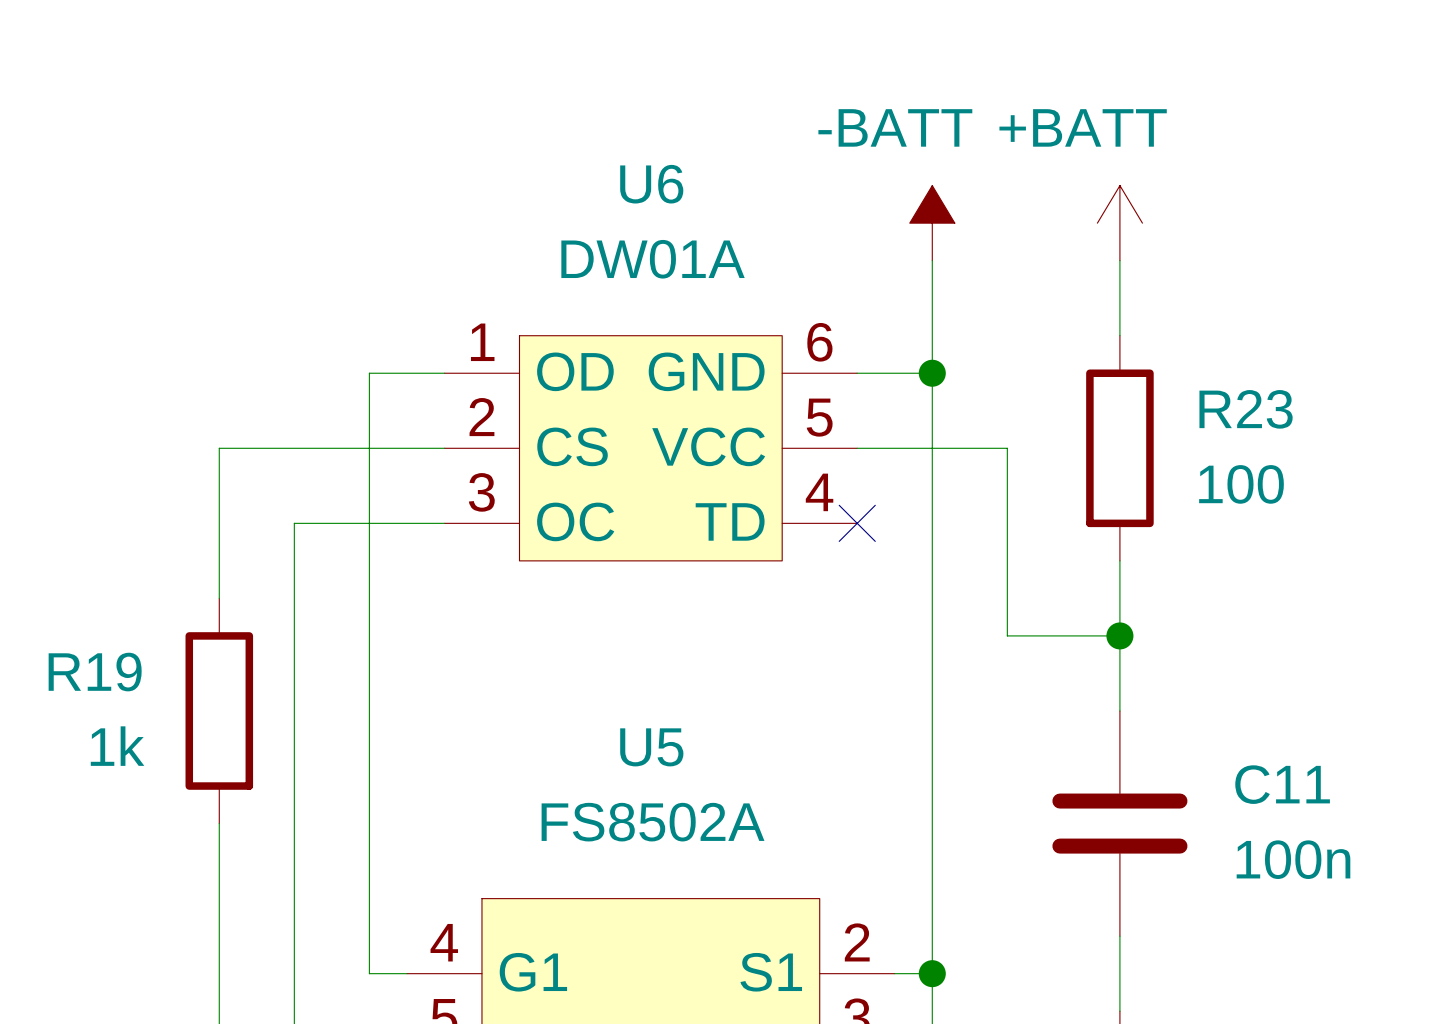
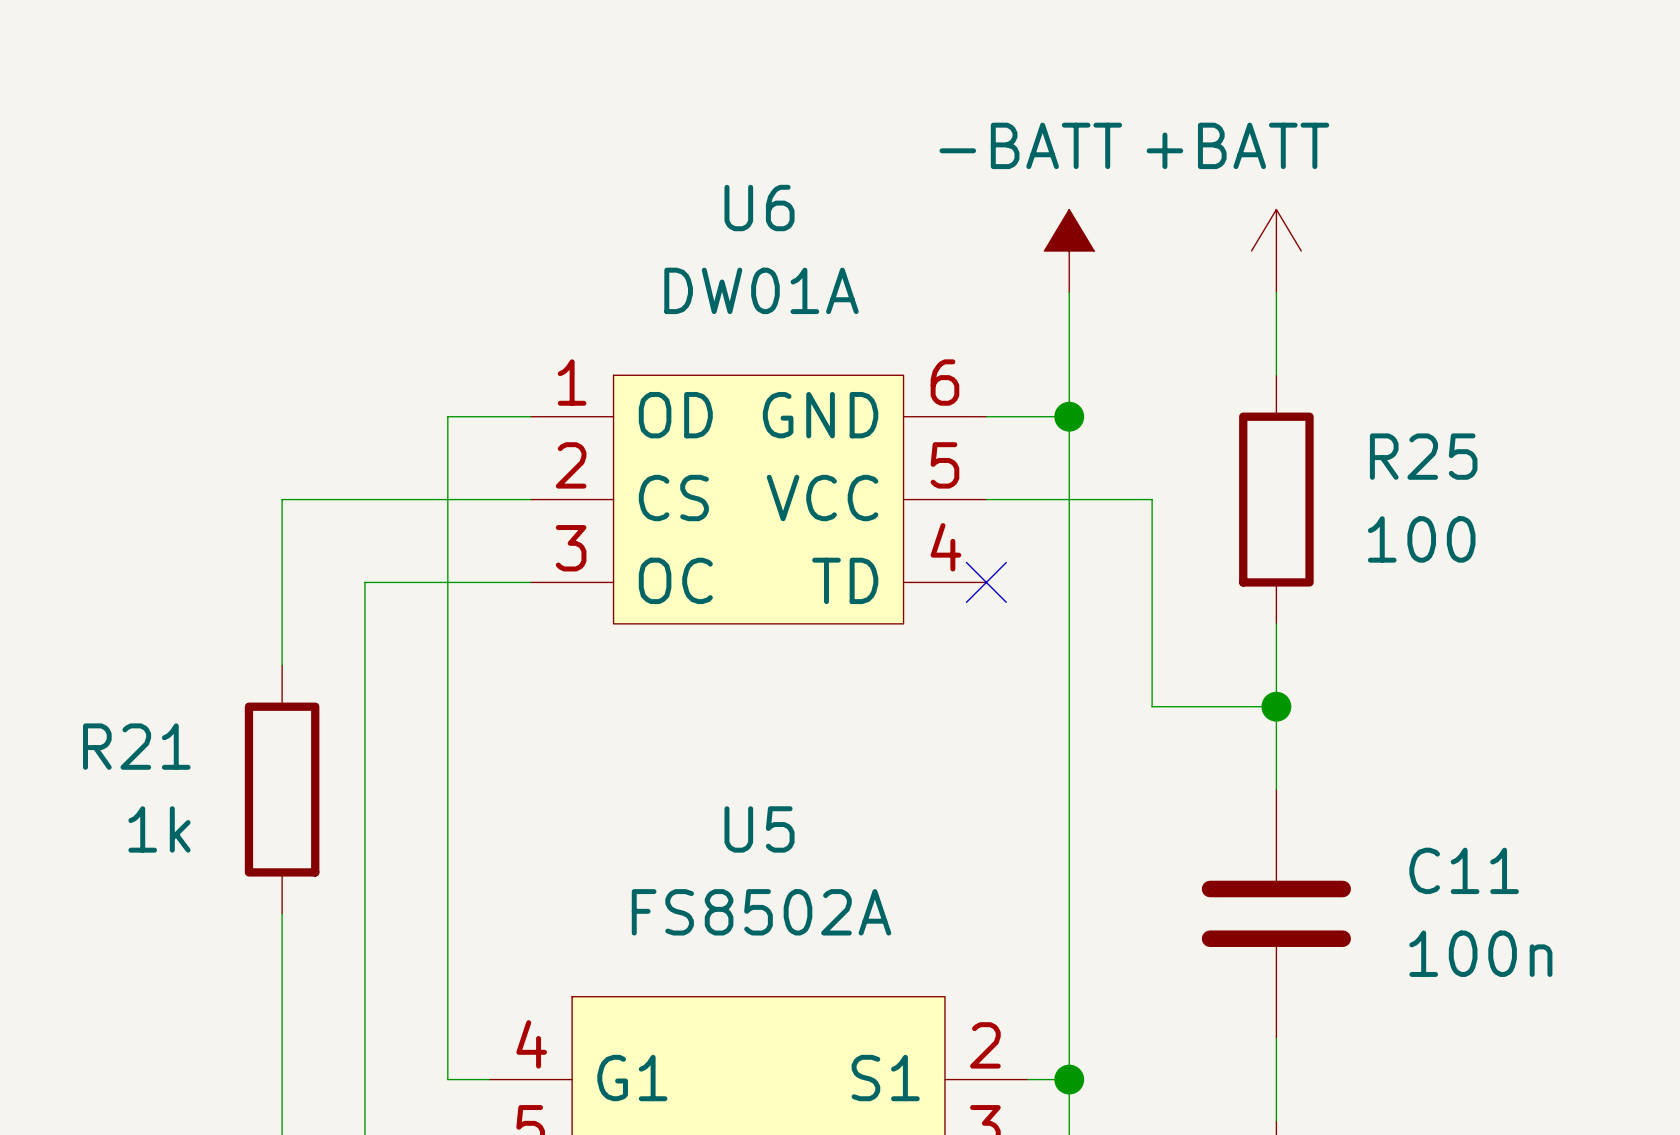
R23 name: R23 (1246, 409) -> R25 (1423, 456)
R19 name: R19 (95, 672) -> R21 (136, 746)

